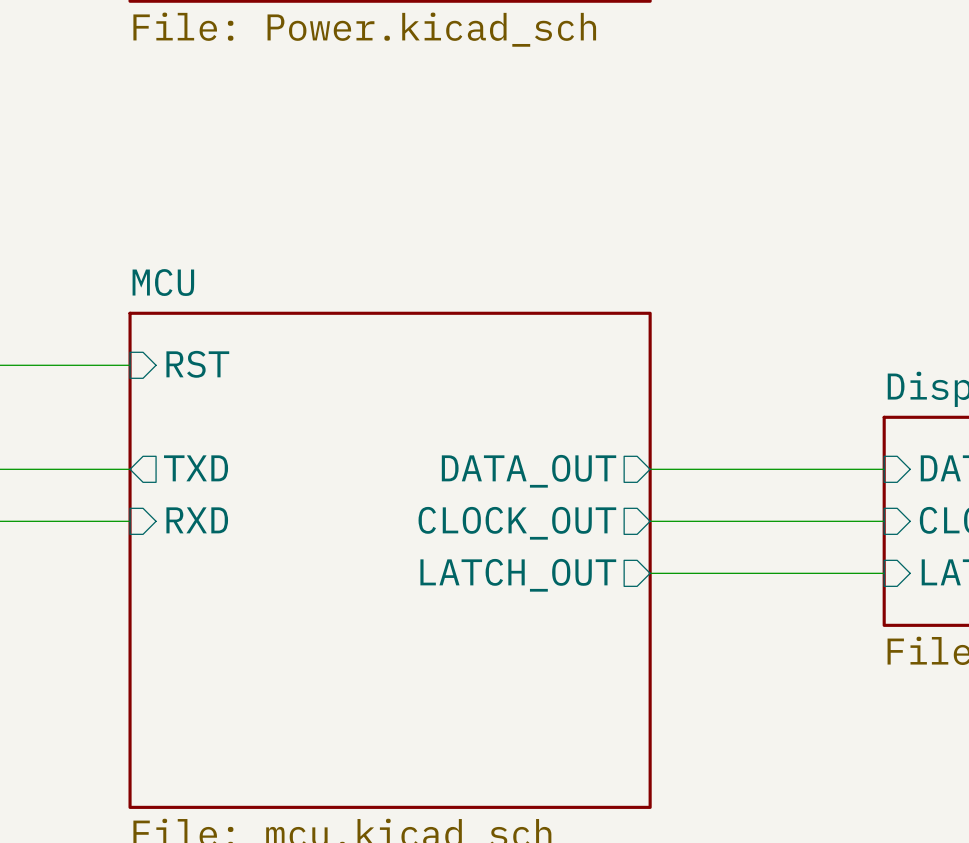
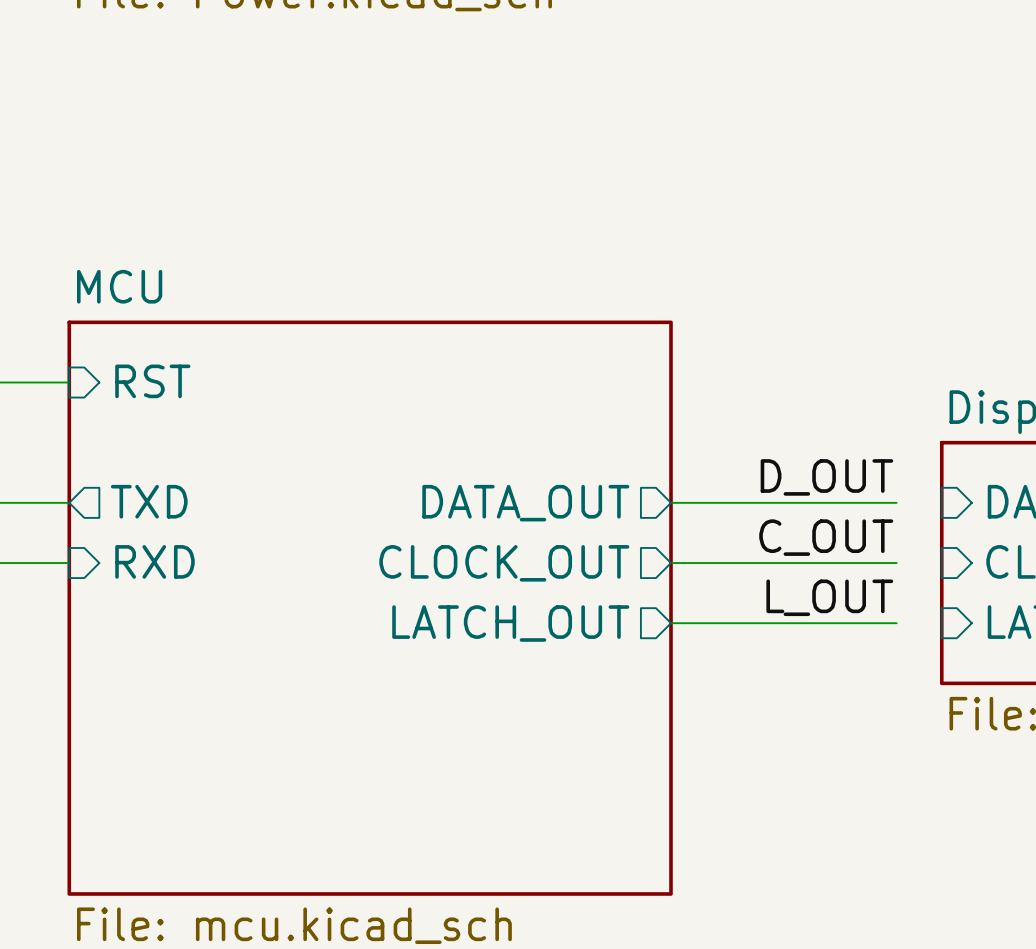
label: none -> D_OUT (826, 477)
wire: (845, 469) (884, 469) -> none
label: none -> C_OUT (826, 537)
wire: (845, 521) (884, 521) -> none
label: none -> L_OUT (829, 597)
wire: (845, 573) (884, 573) -> none

